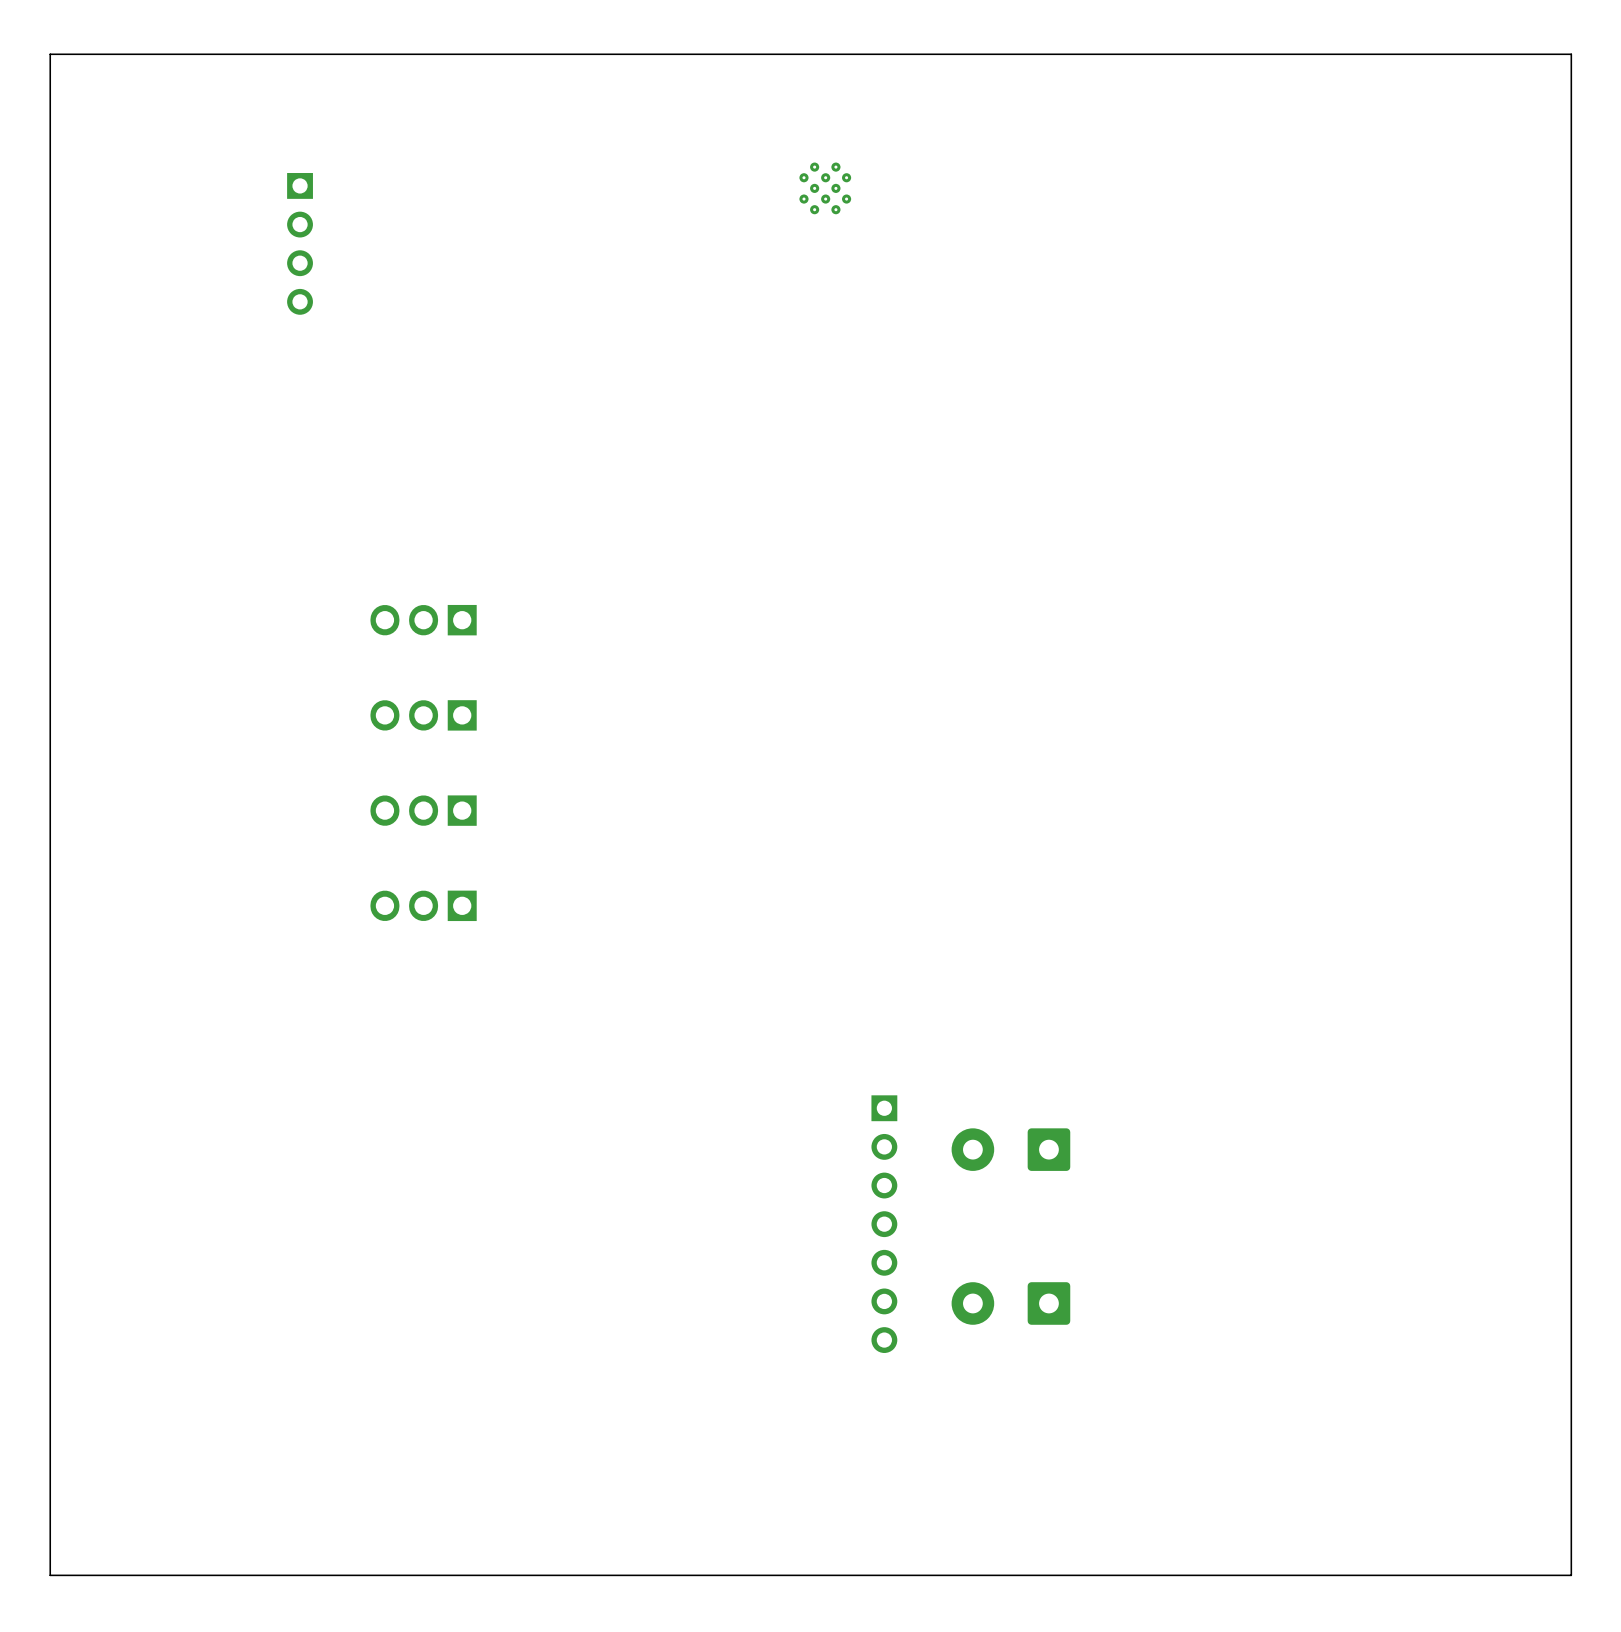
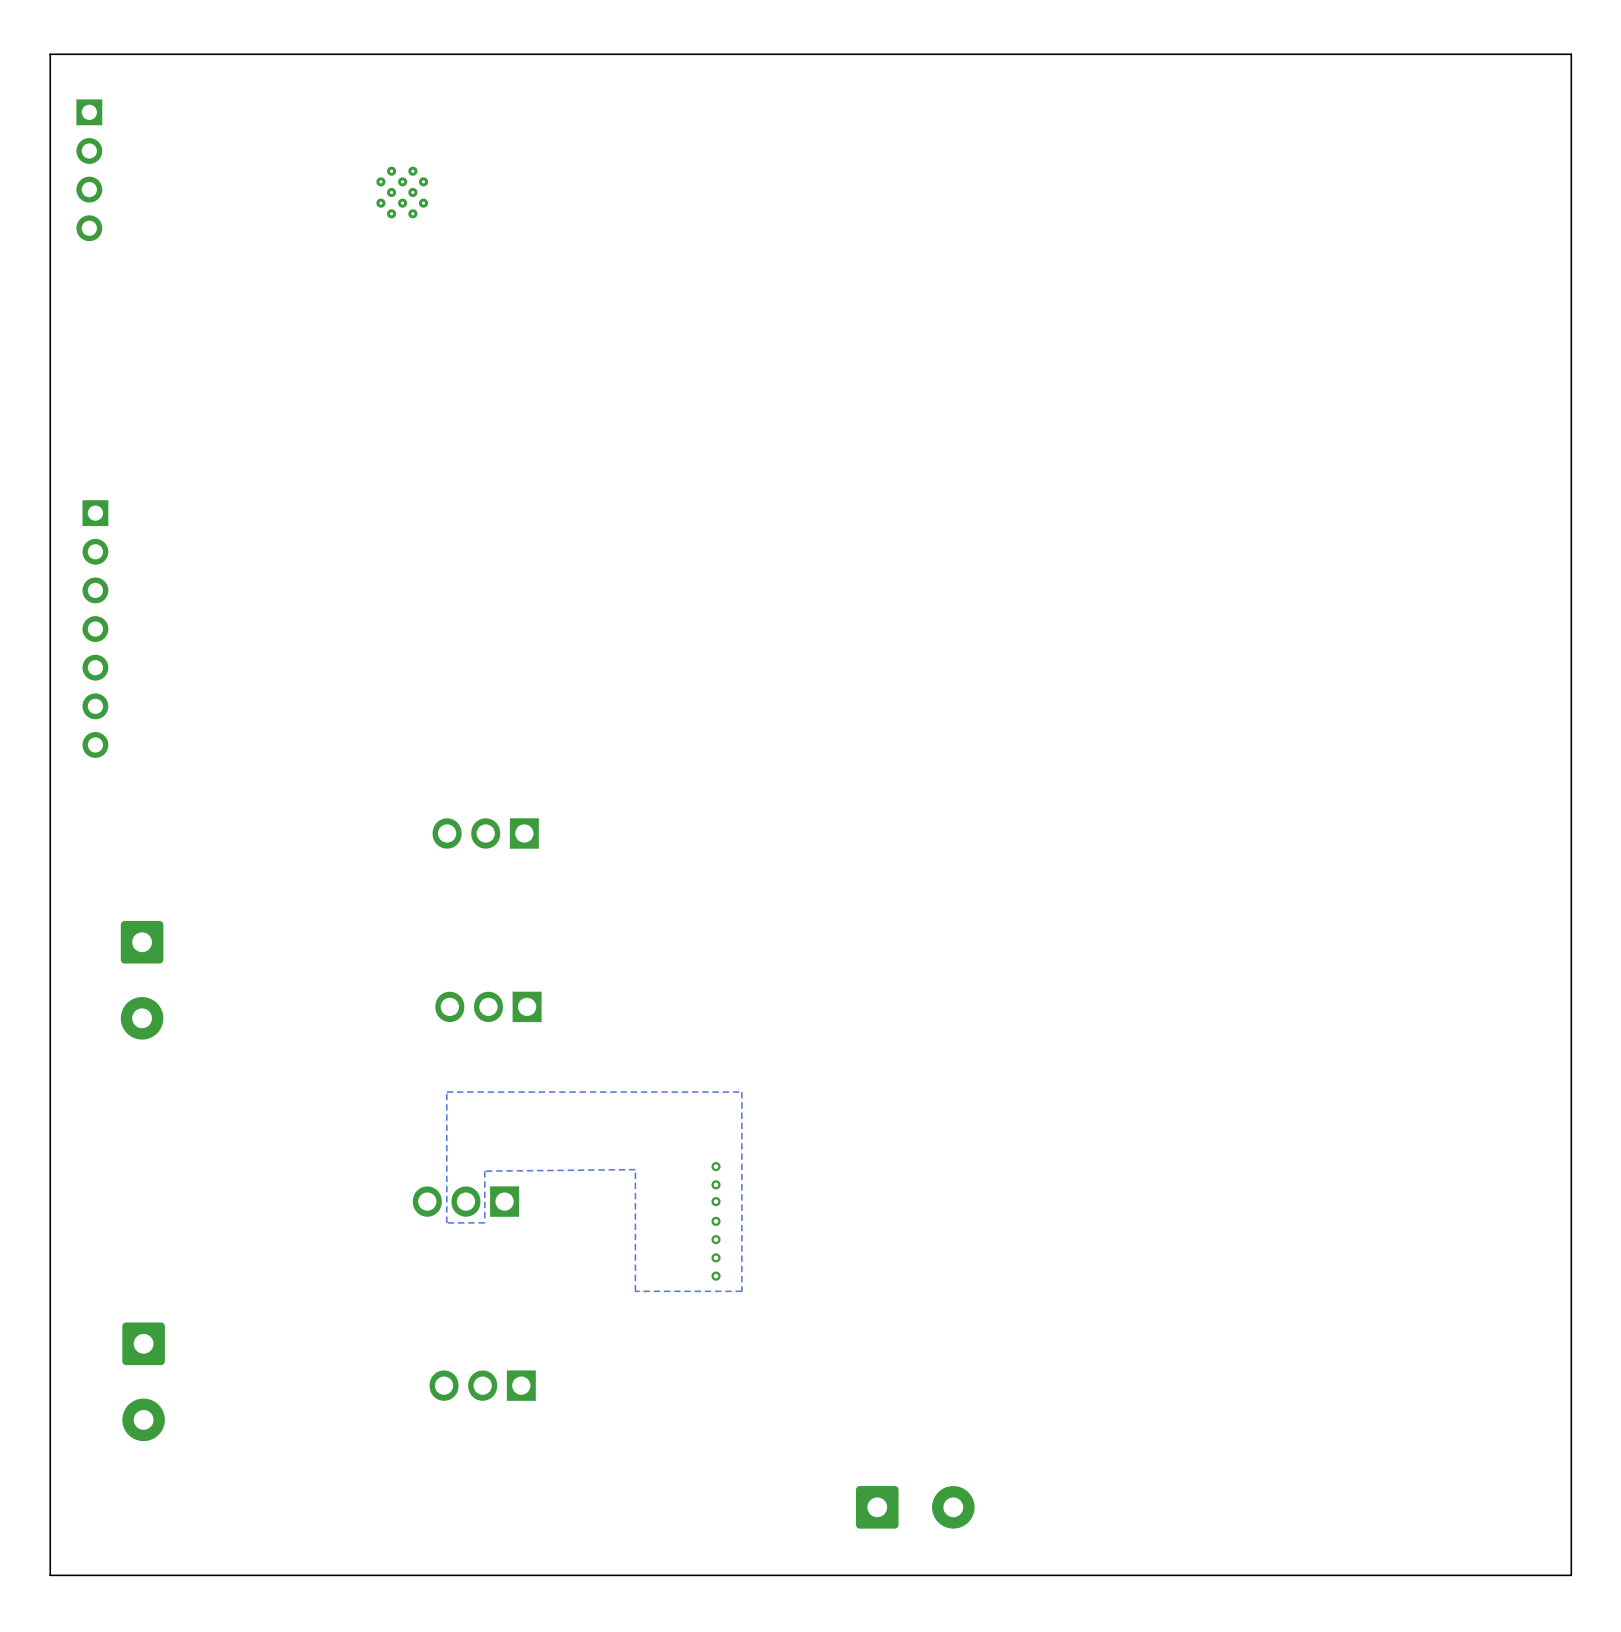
part: (825, 188) -> none
part: none -> (402, 192)
part position: (300, 243) -> (89, 170)
part: (423, 620) -> none
part: none -> (95, 629)
part: (423, 715) -> none
part: (423, 810) -> none
part: none -> (485, 833)
part: (423, 905) -> none
part: none -> (142, 980)
part: none -> (488, 1006)
zone outline: none -> (741, 1092) (446, 1092) (446, 1222) (484, 1222) (484, 1171) (635, 1169) (635, 1291) (741, 1291) (741, 1092)
part: (1010, 1149) -> none
via: none -> (716, 1166)
via: none -> (716, 1184)
part: none -> (465, 1201)
via: none -> (716, 1201)
via: none -> (716, 1221)
part: (884, 1224) -> none
via: none -> (716, 1239)
via: none -> (716, 1257)
via: none -> (716, 1276)
part: (1010, 1303) -> none
part: none -> (143, 1381)
part: none -> (482, 1385)
part: none -> (915, 1507)

